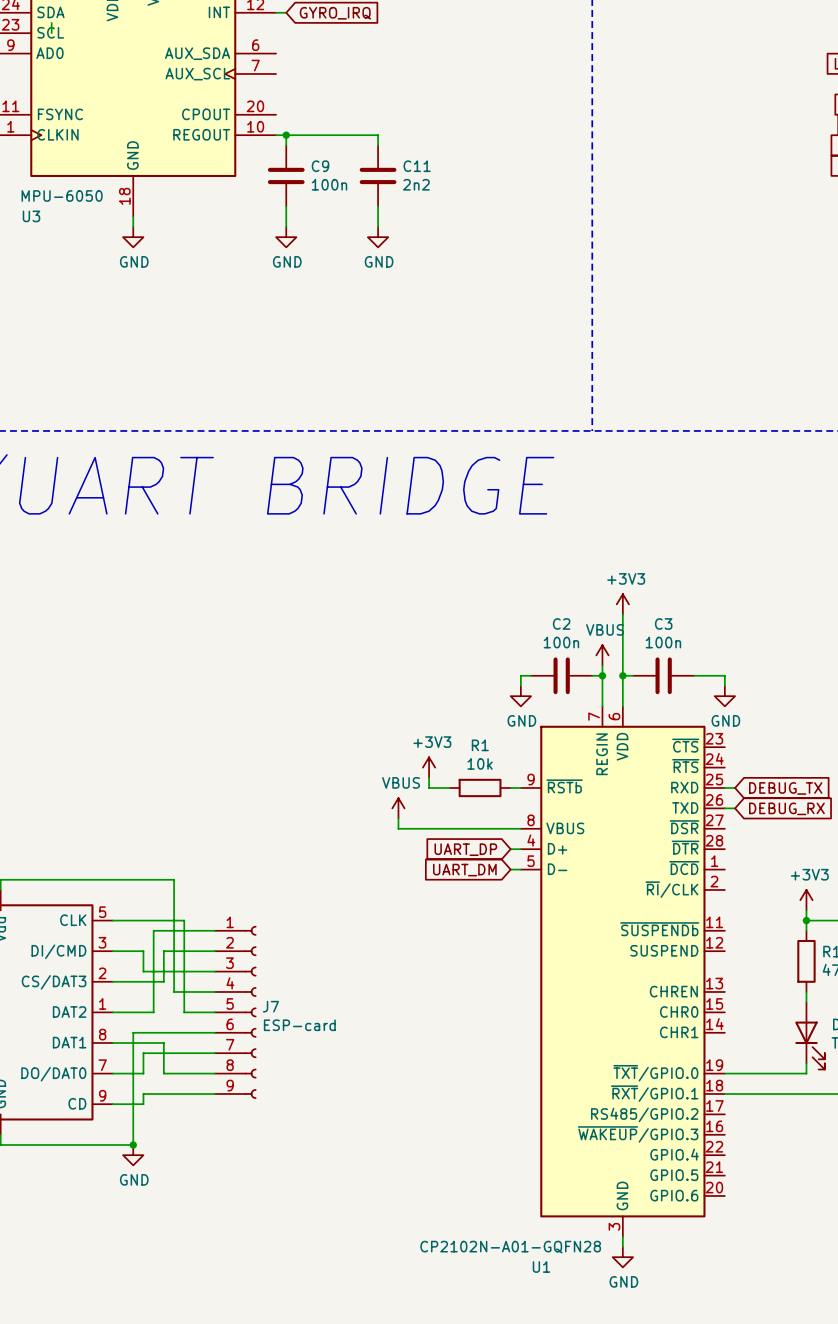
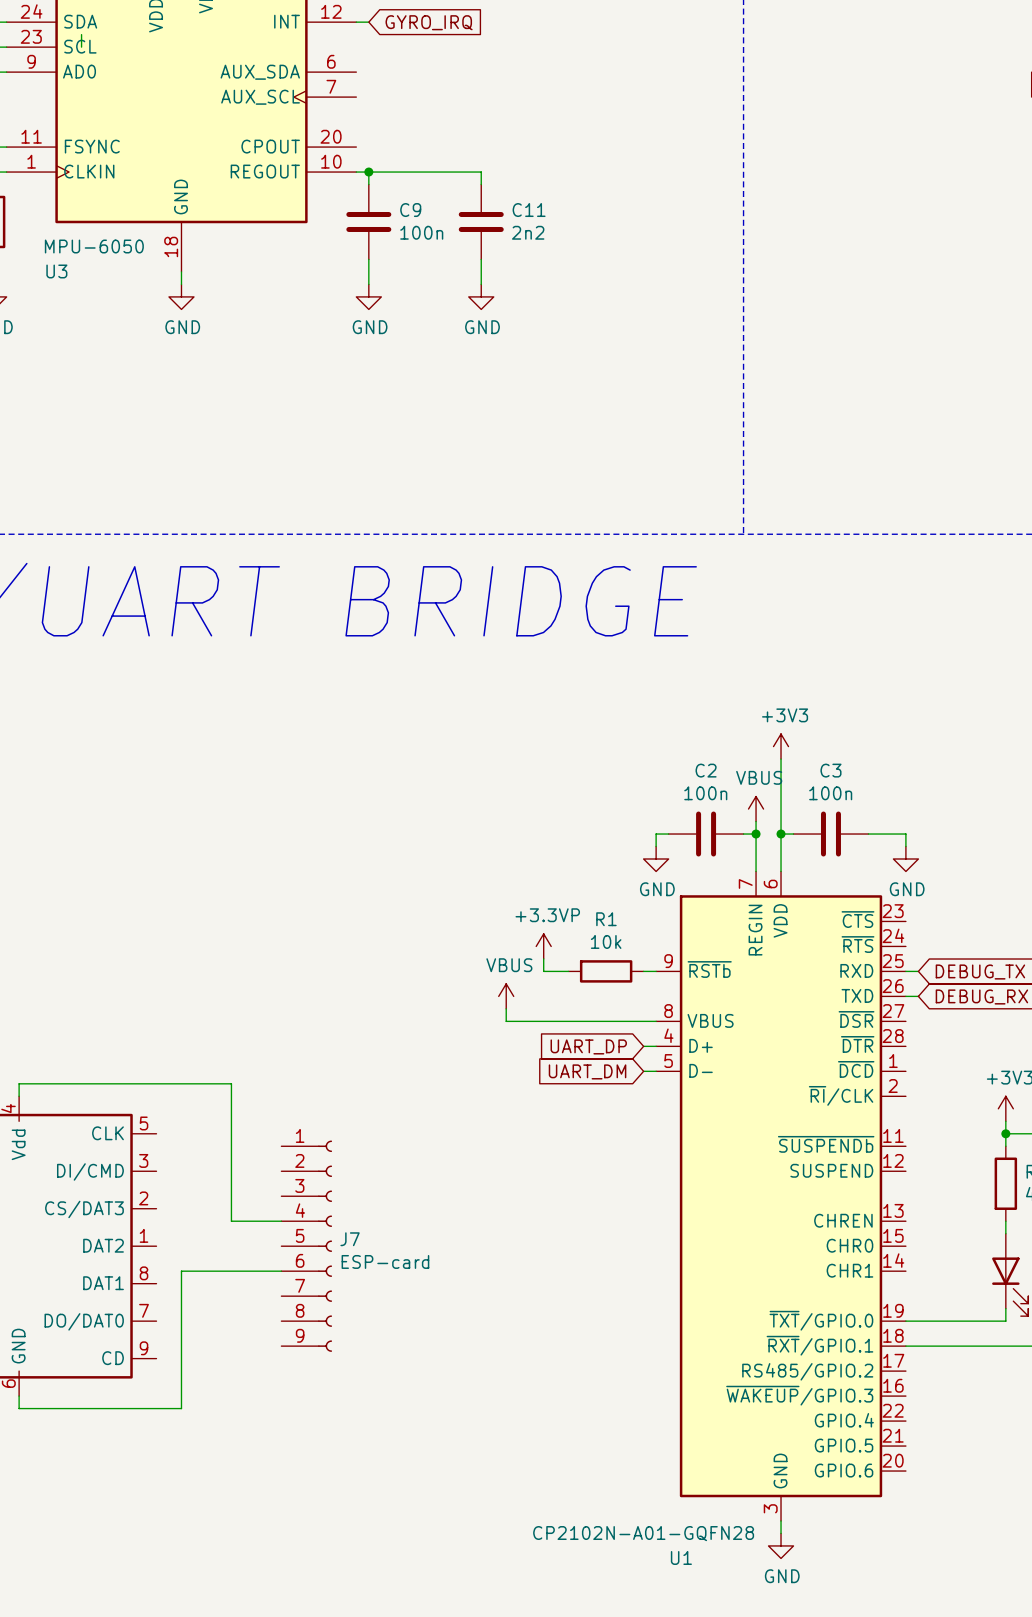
power symbol: +3V3 (429, 767) -> +3.3VP (543, 946)
wire: (112, 920) (184, 920) (184, 1012) (214, 1012) -> none
wire: (214, 930) (153, 930) (153, 1012) (112, 1012) -> none
wire: (112, 951) (143, 951) (143, 971) (214, 971) -> none
wire: (214, 951) (163, 951) (163, 981) (112, 981) -> none
wire: (112, 1042) (163, 1042) (163, 1073) (214, 1073) -> none
wire: (214, 1053) (143, 1053) (143, 1073) (112, 1073) -> none
wire: (214, 1093) (143, 1093) (143, 1104) (112, 1104) -> none
junction: (133, 1144) -> none
power symbol: GND (133, 1155) -> none

